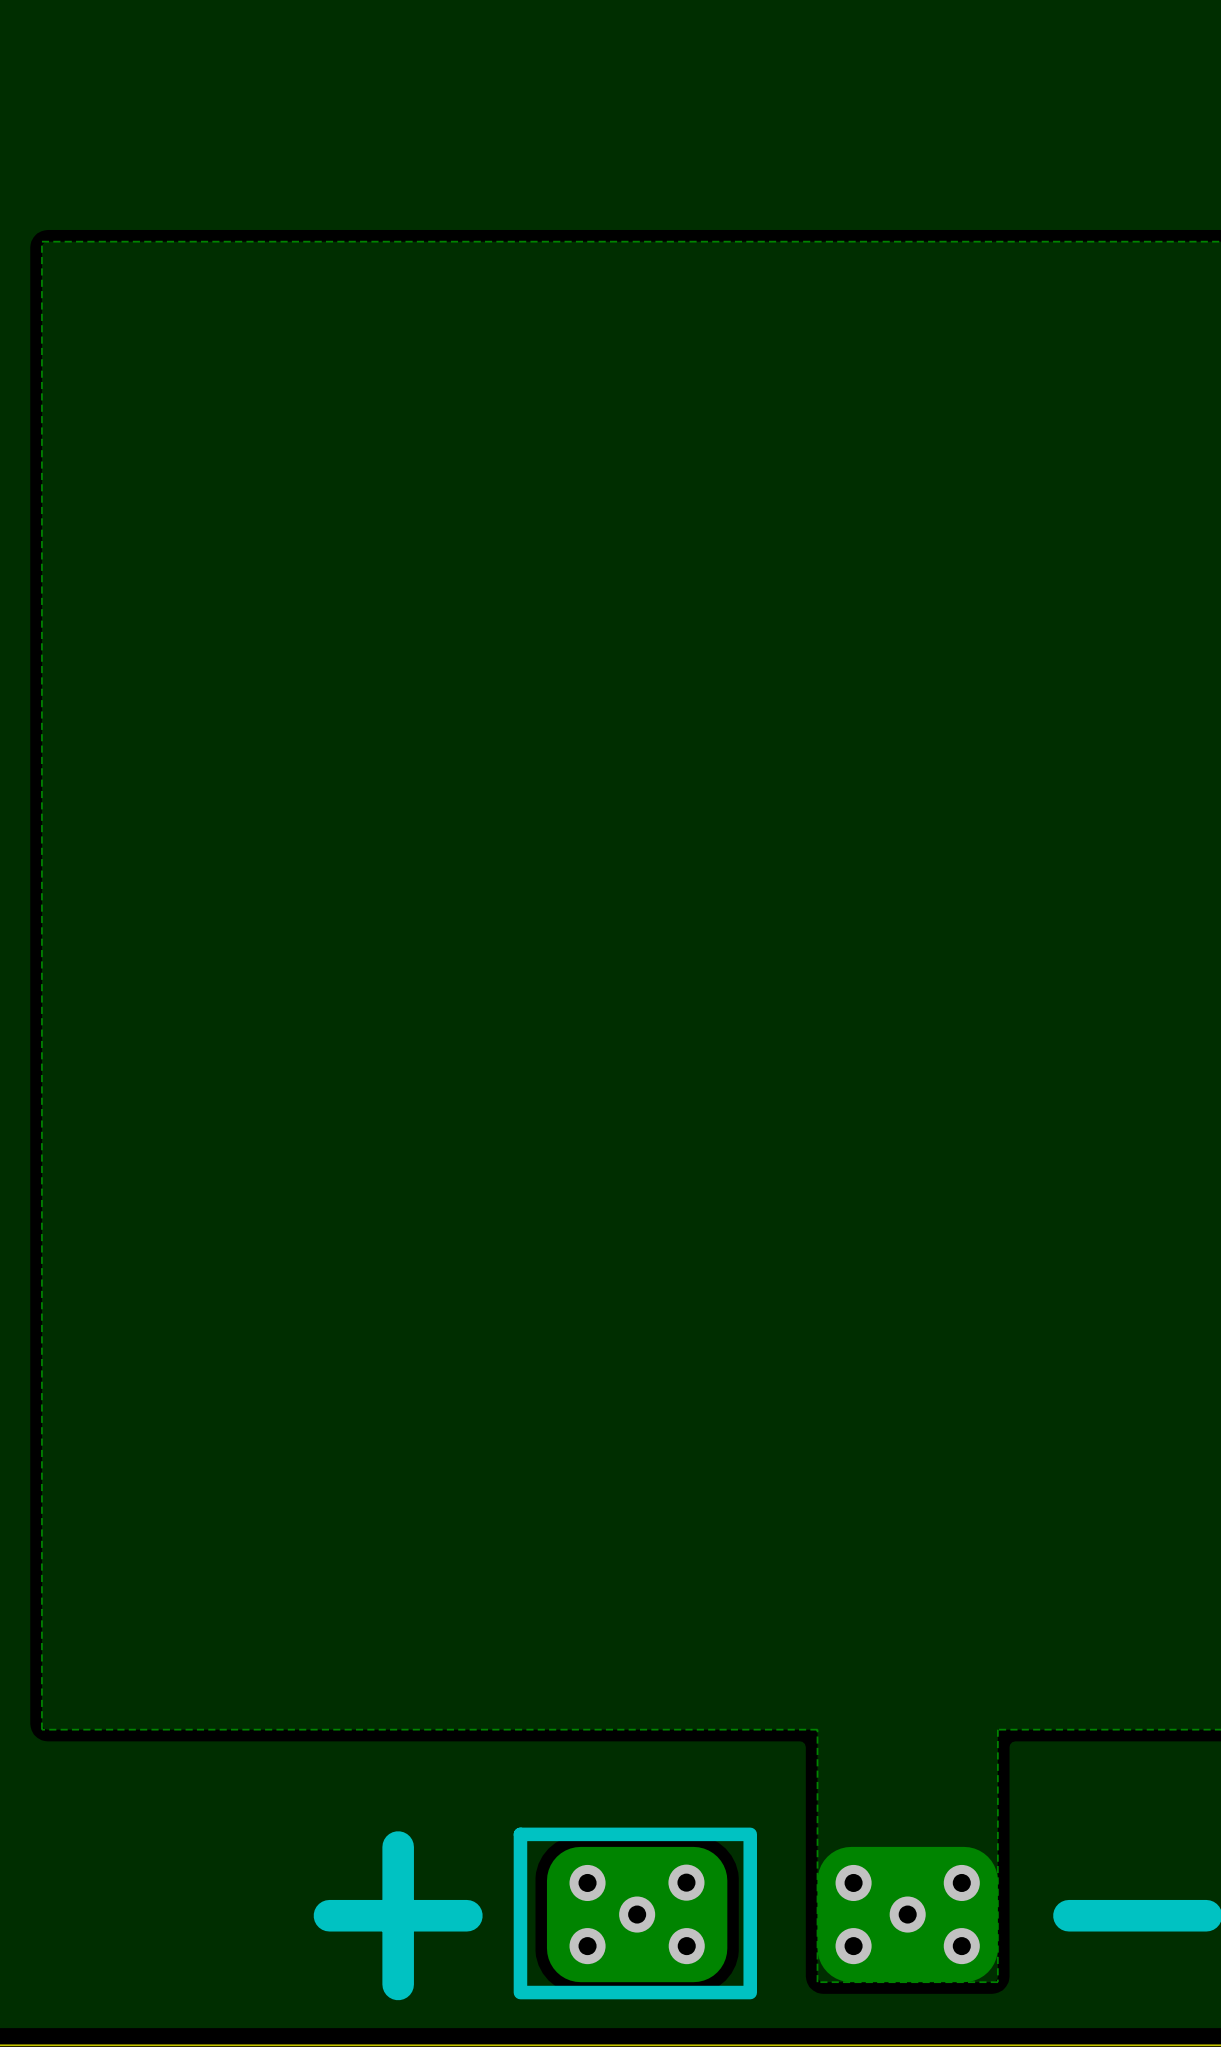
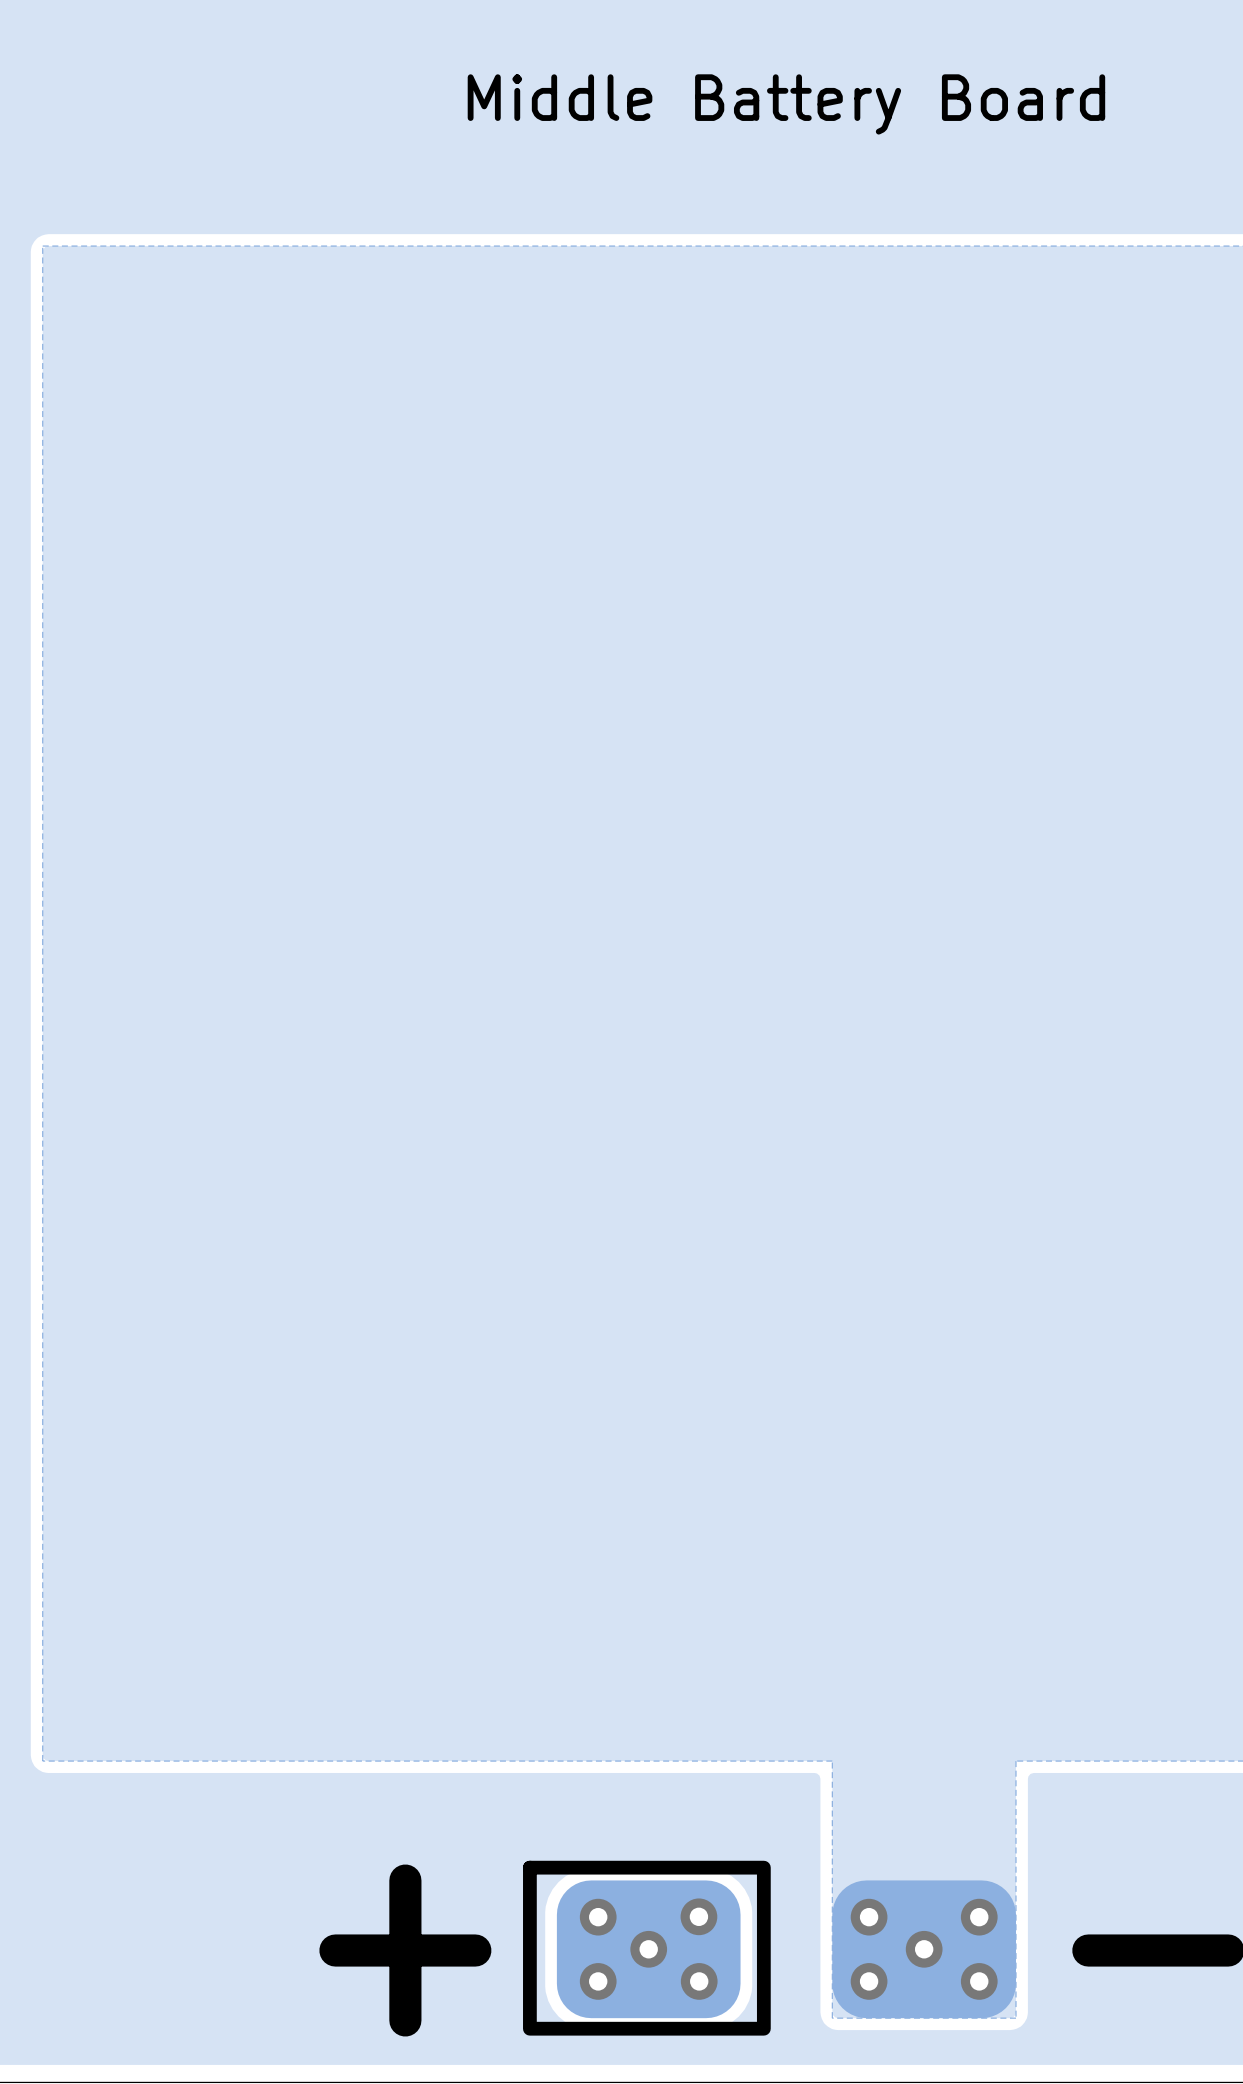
text: none -> Middle Battery Board (786, 104)

